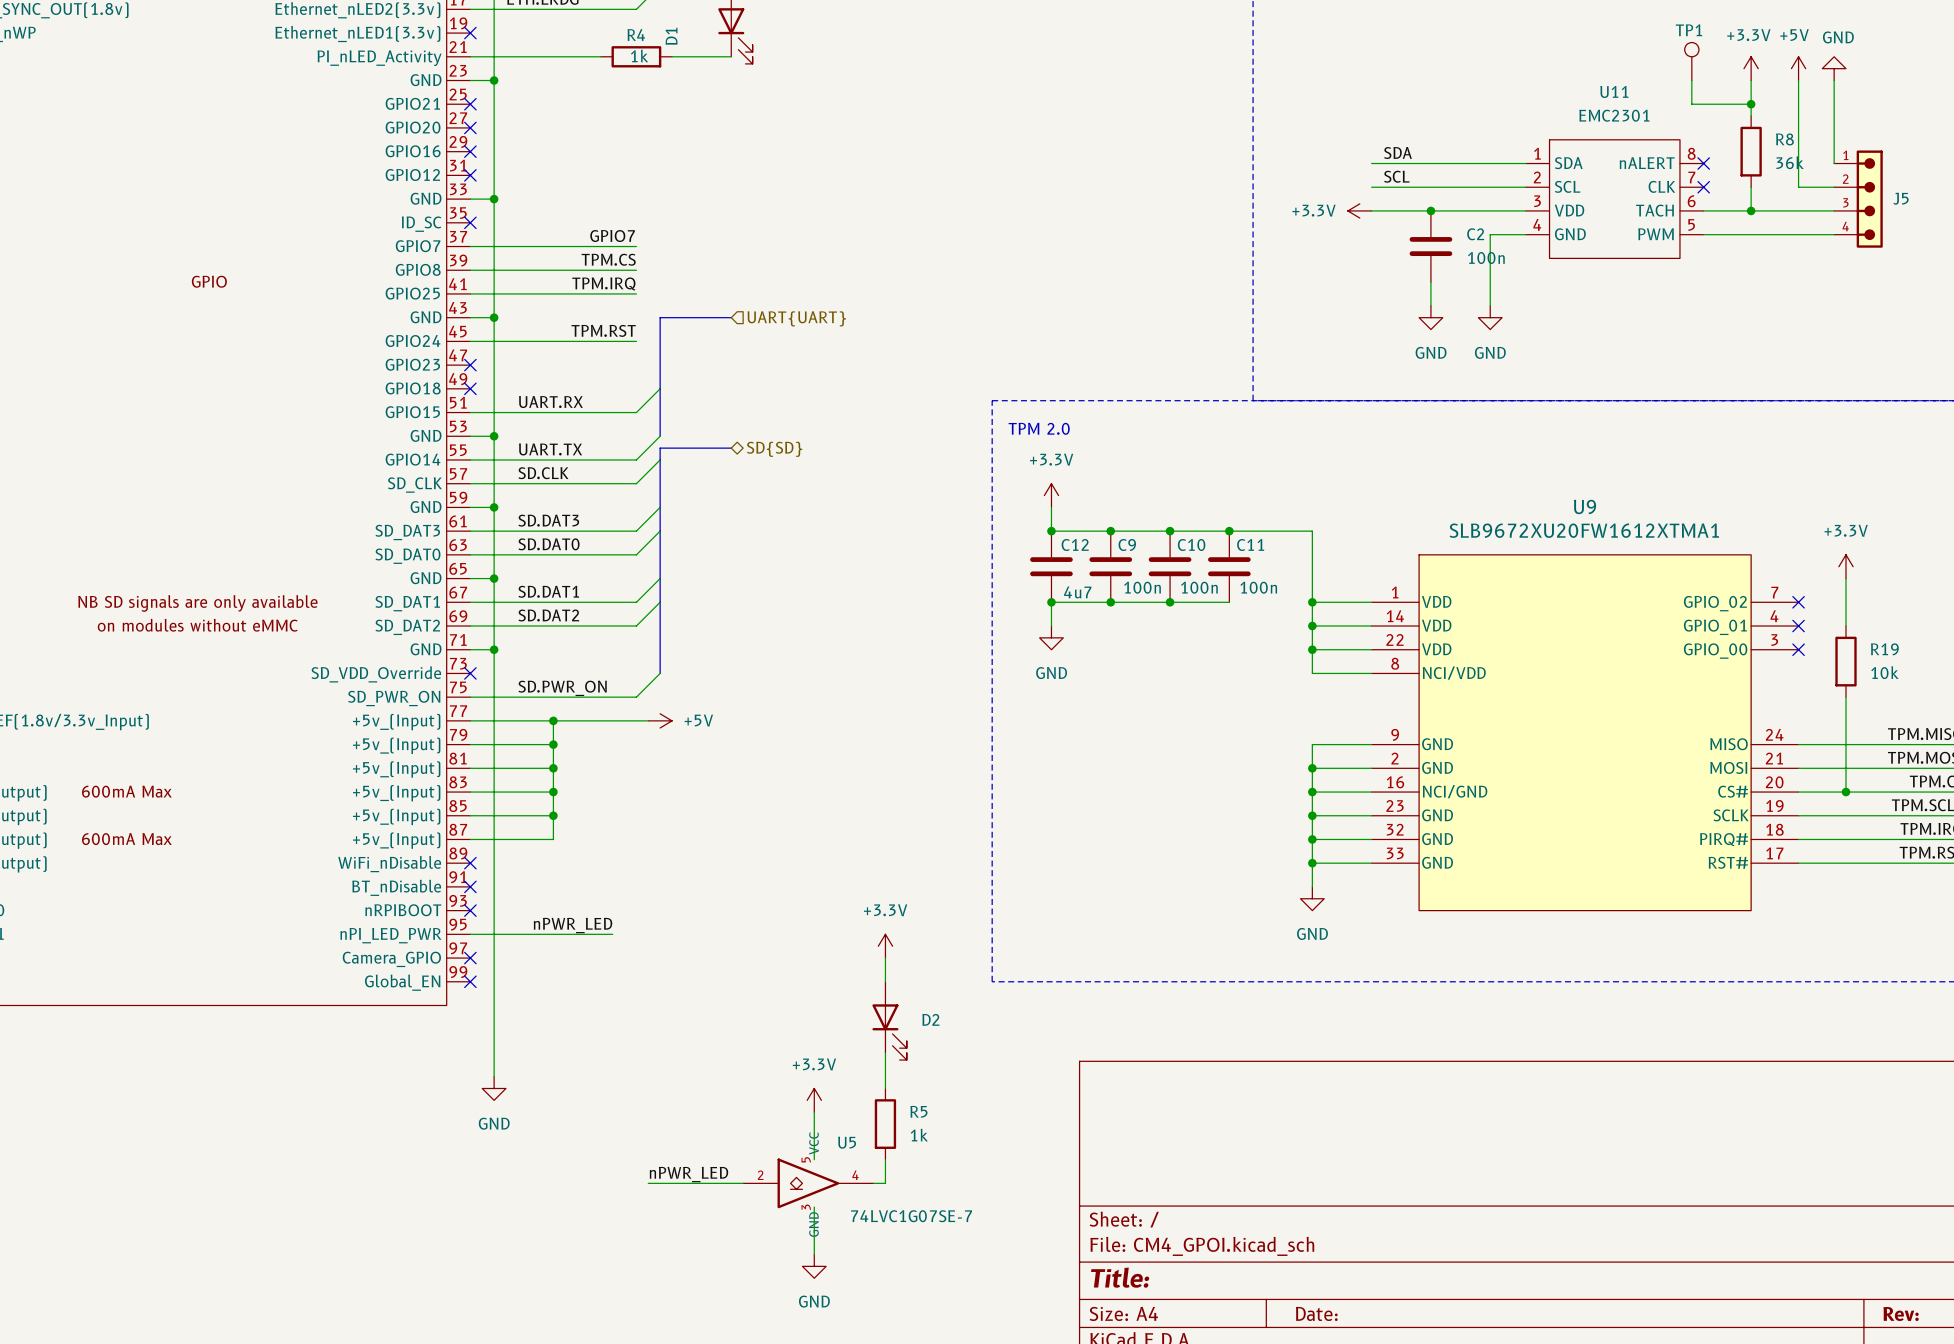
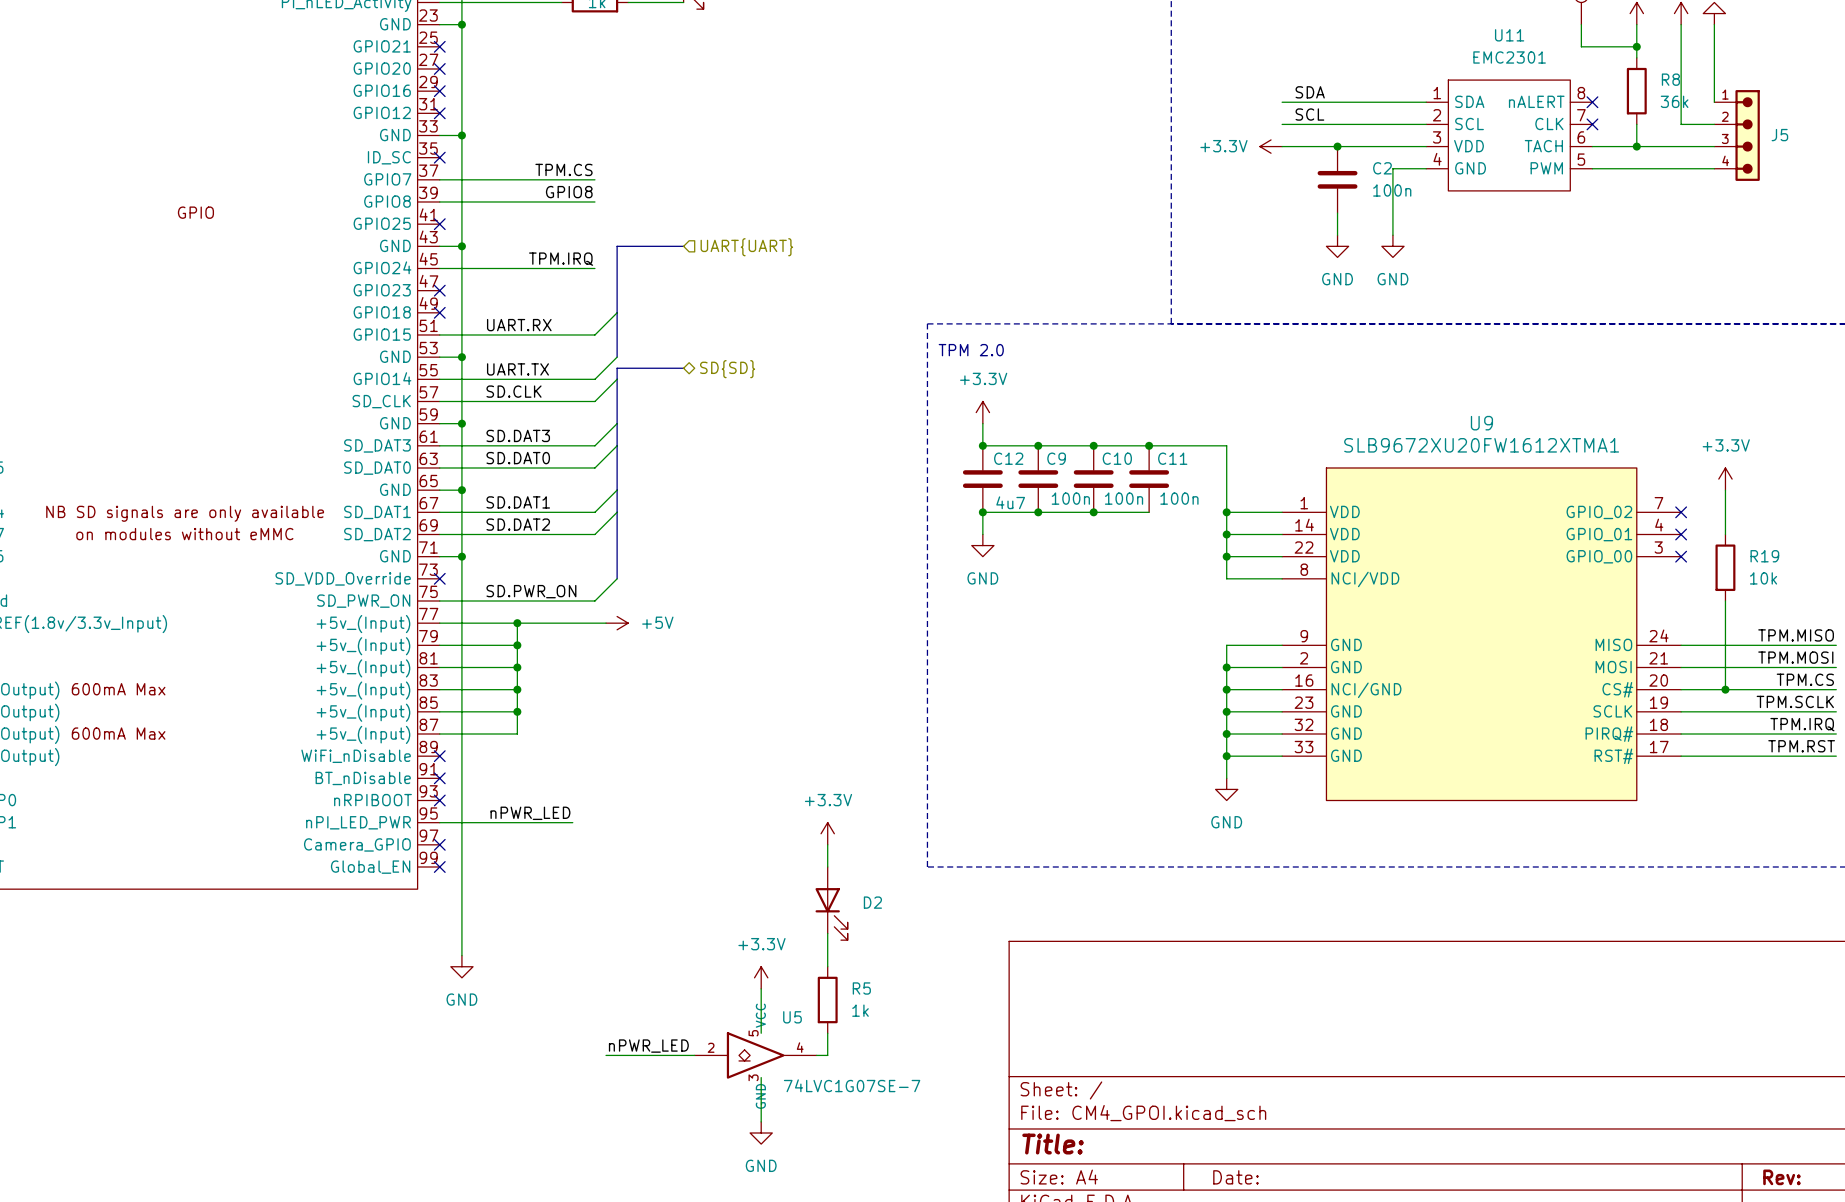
label: GPIO7 (612, 236) -> TPM.CS (563, 169)
label: TPM.CS (608, 259) -> GPIO8 (569, 192)
label: TPM.IRQ (603, 283) -> none
wire: (470, 293) (636, 293) -> none
no-connect mark: none -> (439, 224)
label: TPM.RST (603, 330) -> TPM.IRQ (561, 259)

